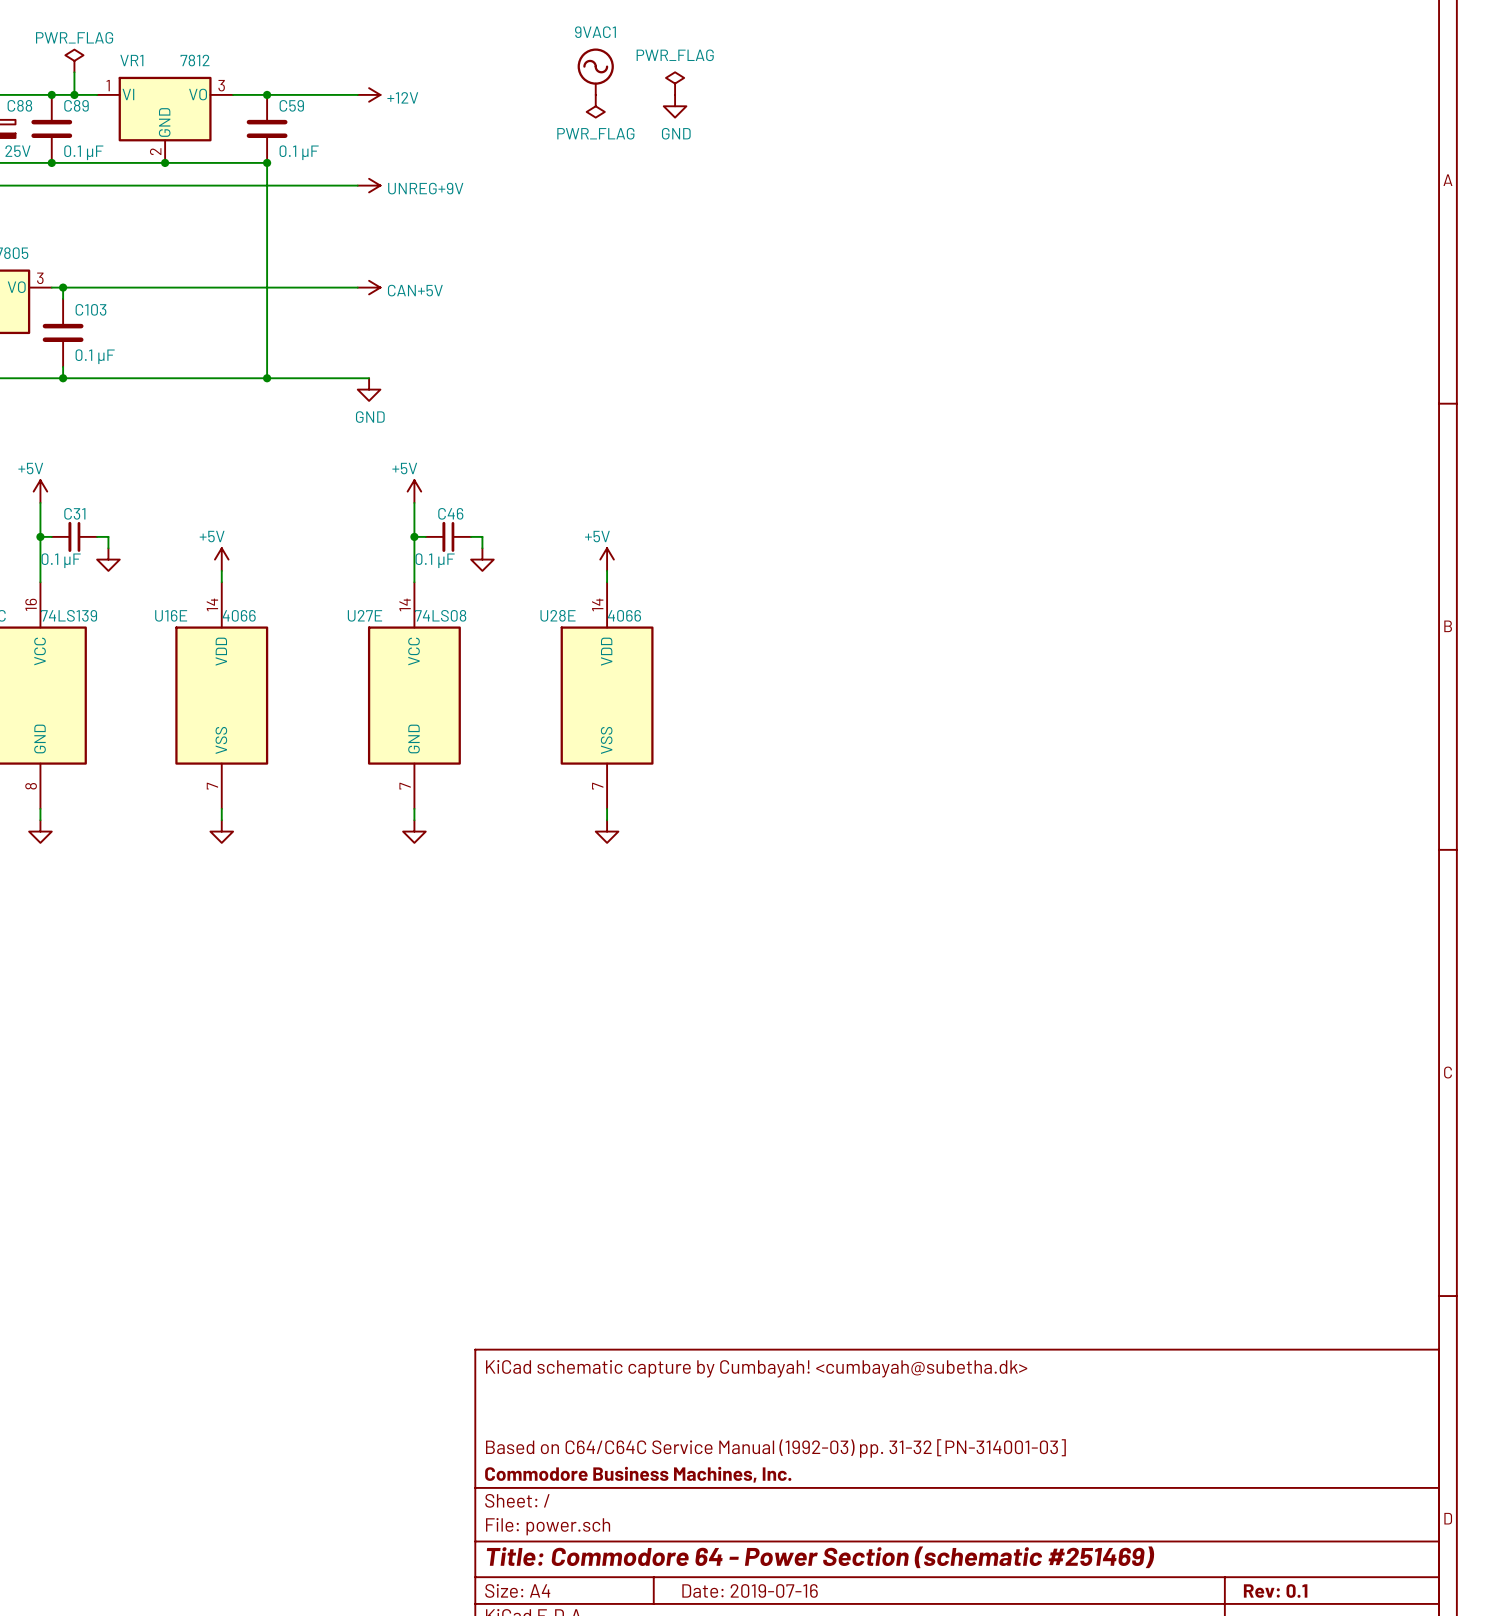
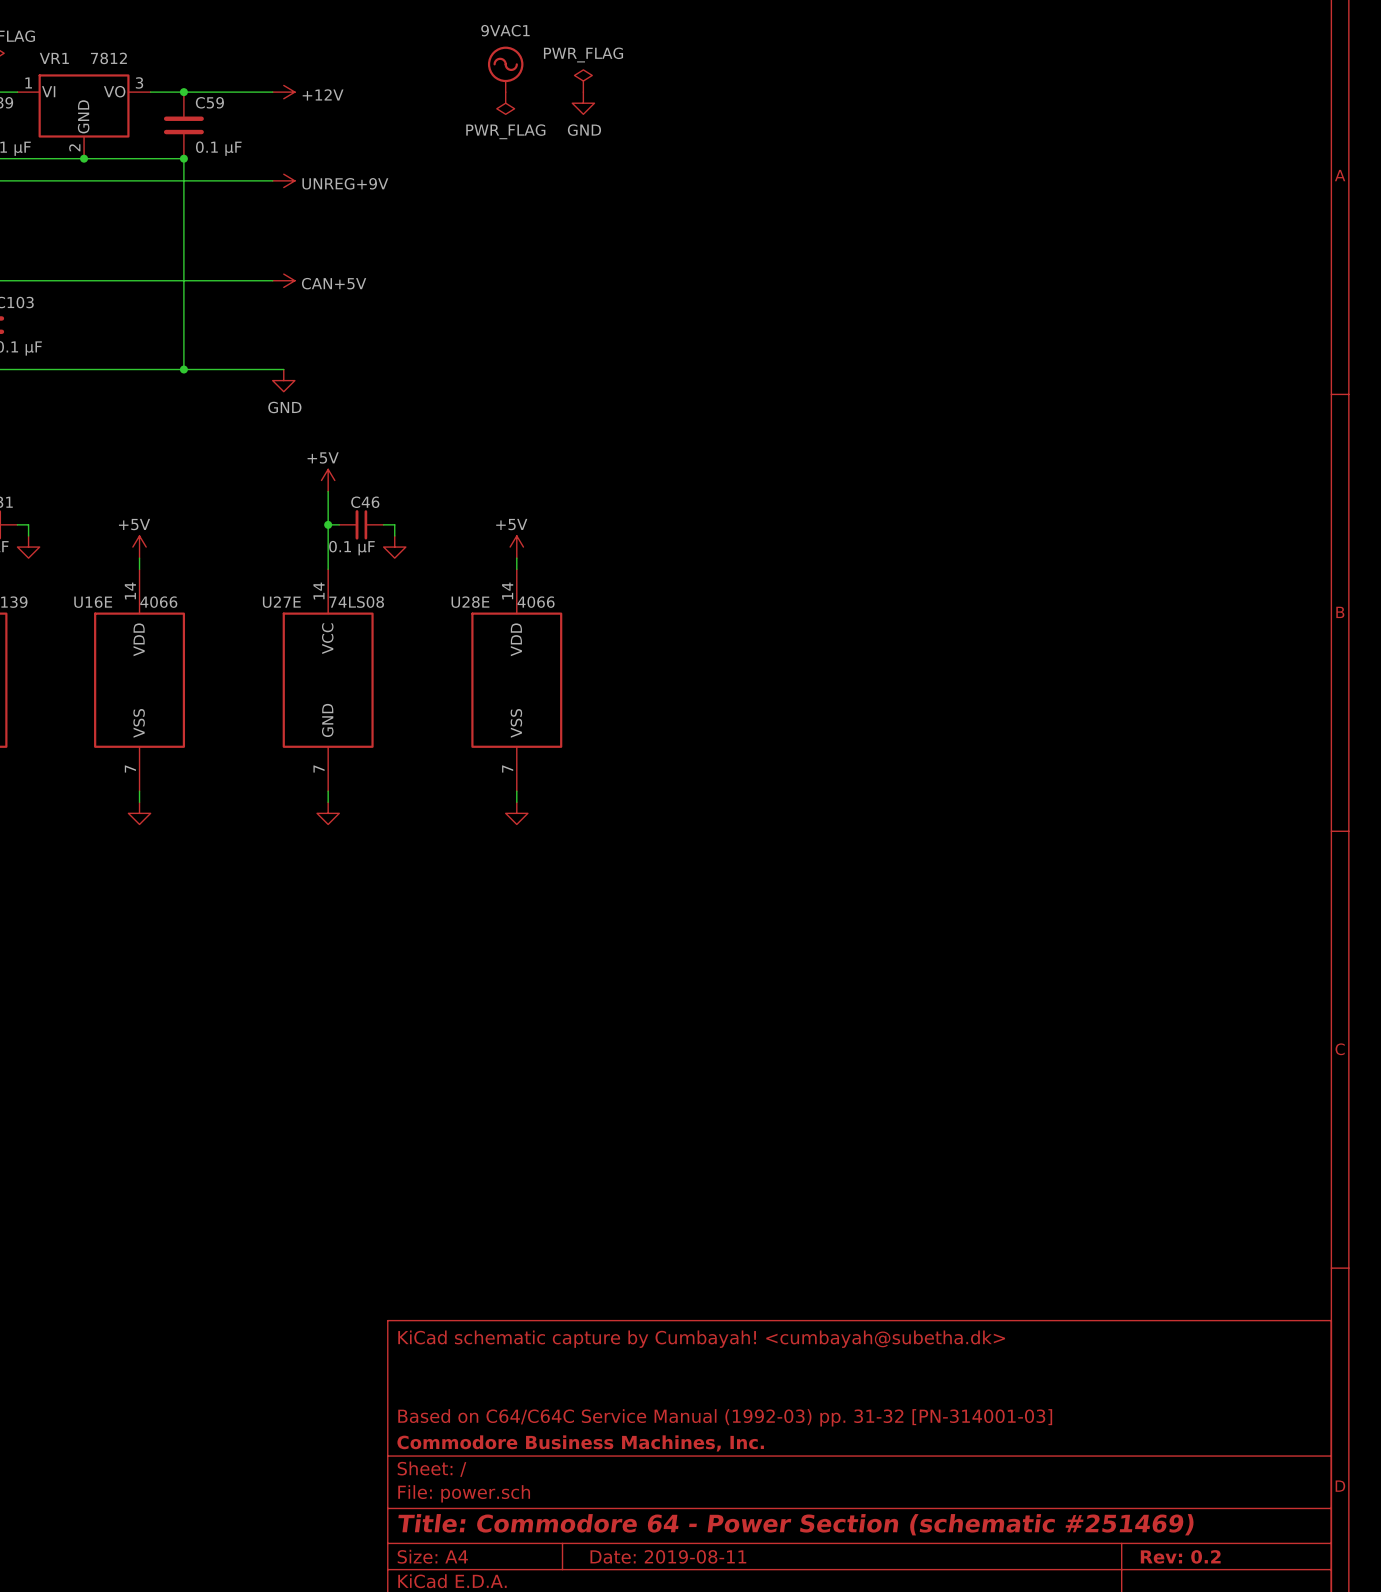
title block: Date: 2019-07-16 (750, 1590) -> Date: 2019-08-11 (668, 1556)
title block: Rev: 0.1 (1275, 1590) -> Rev: 0.2 (1180, 1556)

